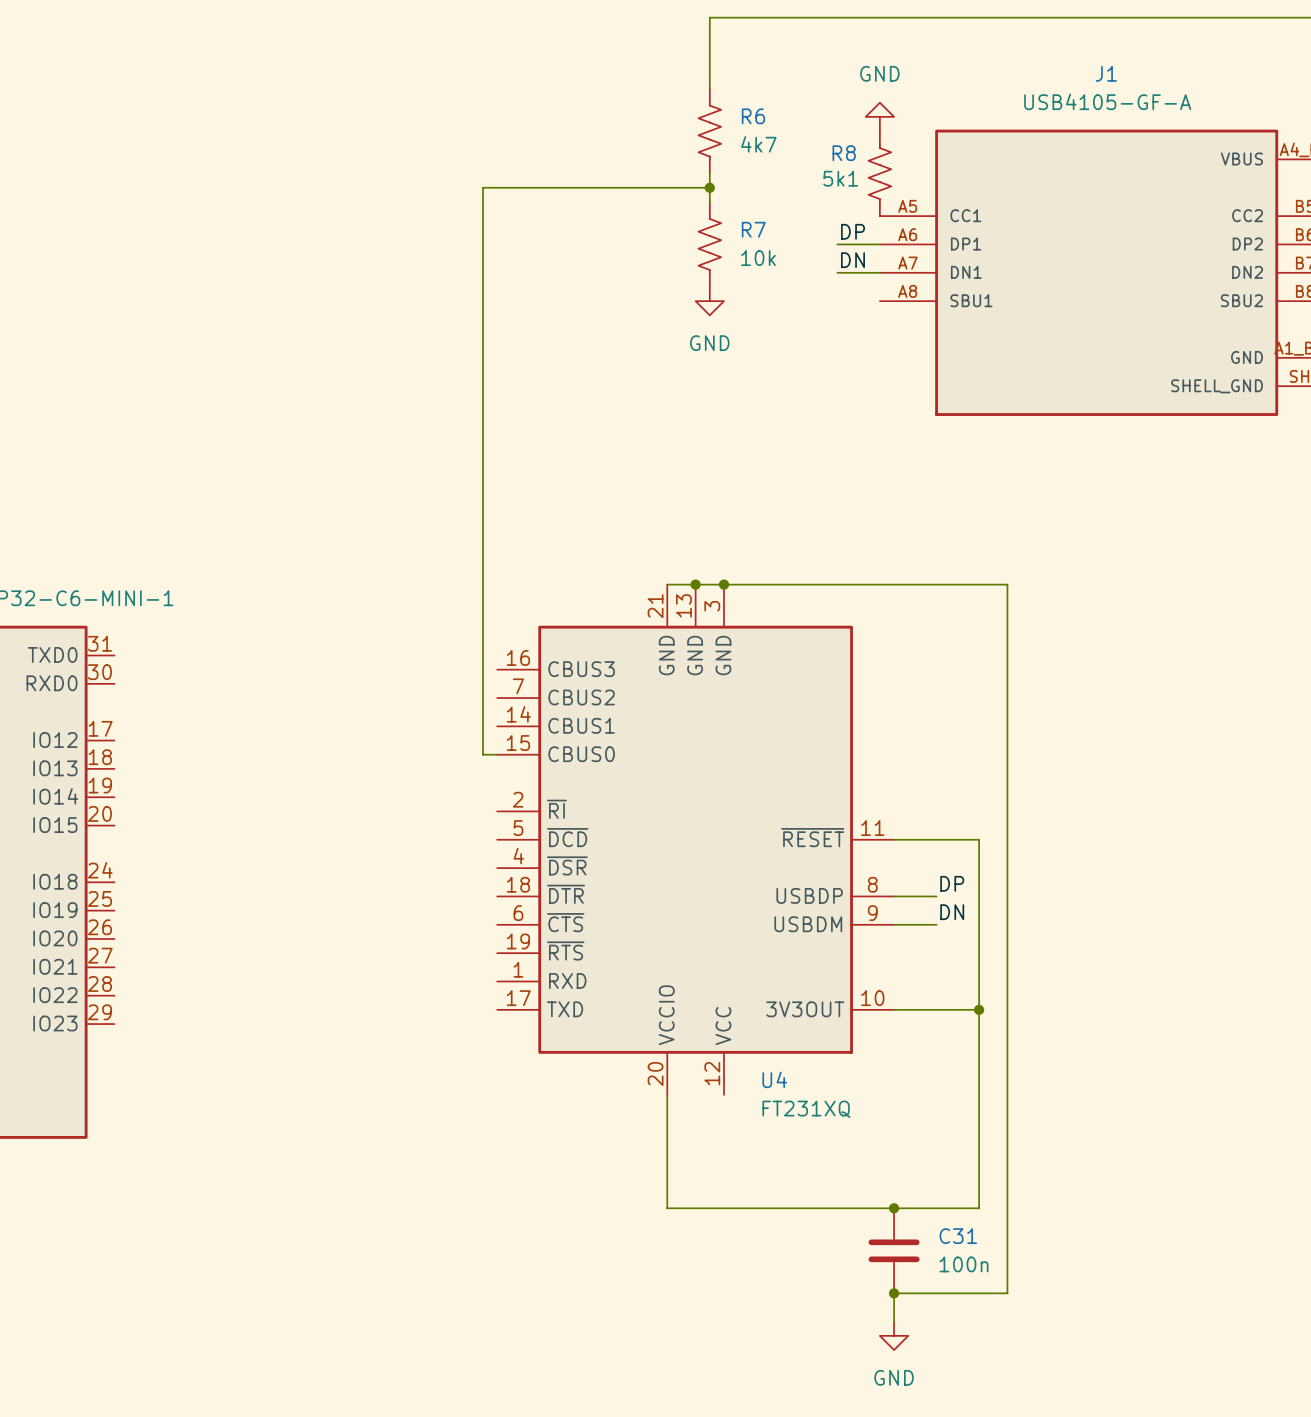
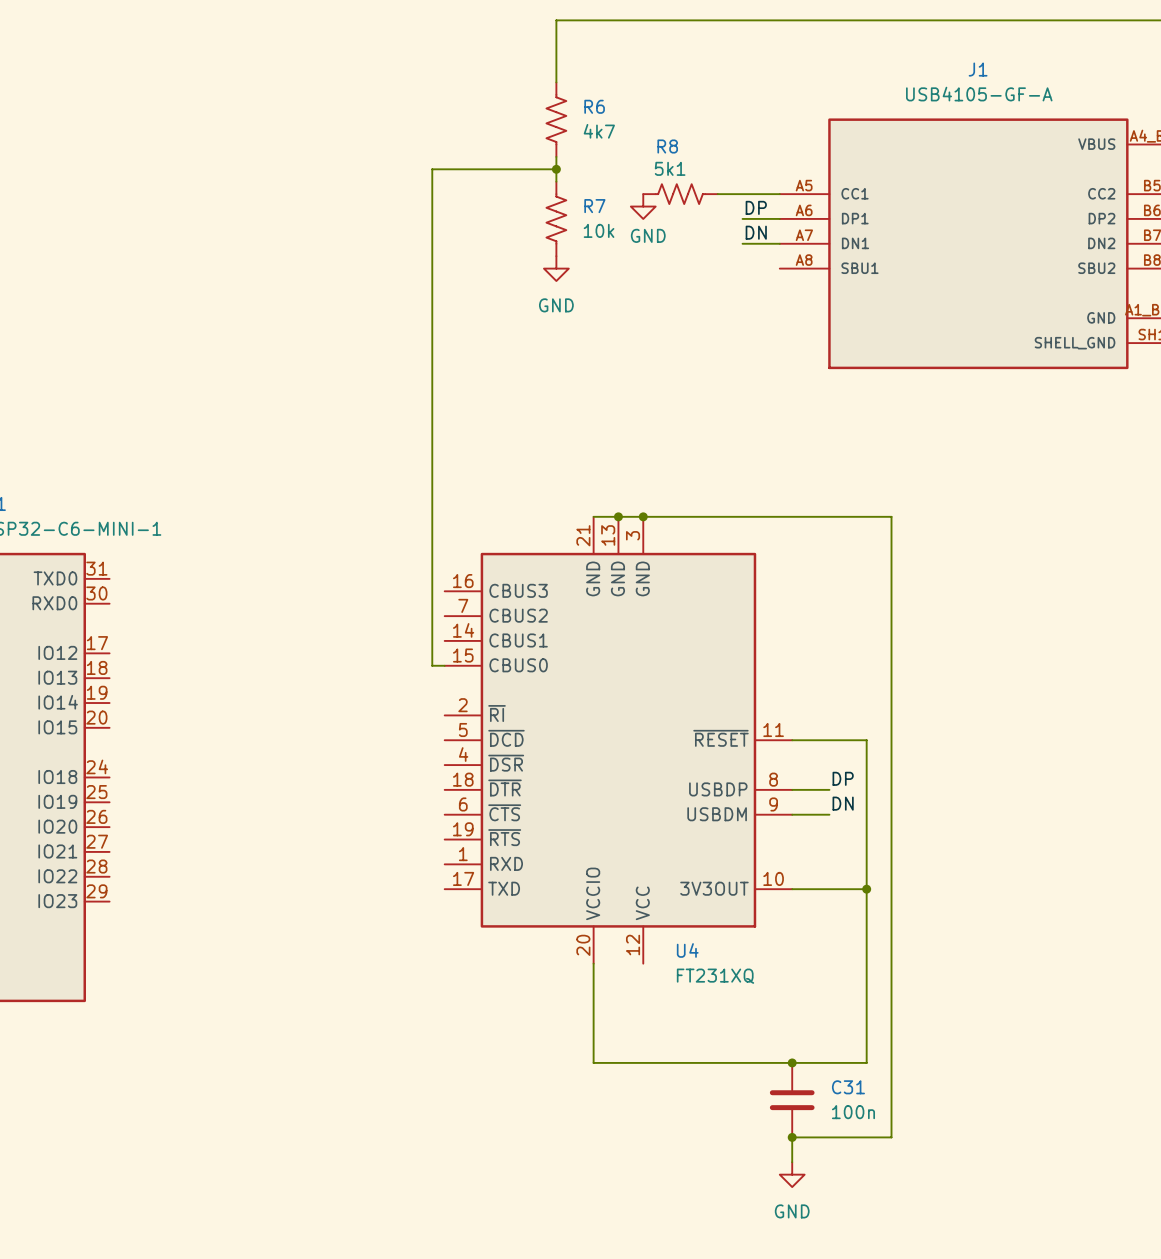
wire: (709, 17) (709, 88) -> (630, 20) (556, 20) (556, 82)
power symbol: GND (879, 116) -> none
R6 position: (709, 131) -> (556, 119)
R8 name position: R8 (844, 153) -> R8 (667, 146)
wire: (709, 173) (709, 201) -> (556, 156) (556, 181)
R8 rotation: 0° (879, 173) -> 90° clockwise (680, 194)
R8 position: (879, 173) -> (680, 194)
wire: (624, 187) (709, 187) -> none
junction: none -> (556, 169)
junction: (709, 187) -> none
wire: none -> (717, 194) (779, 194)
power symbol: none -> GND (643, 206)
R7 position: (709, 244) -> (556, 218)
power symbol: none -> GND (556, 268)
power symbol: GND (709, 301) -> none

